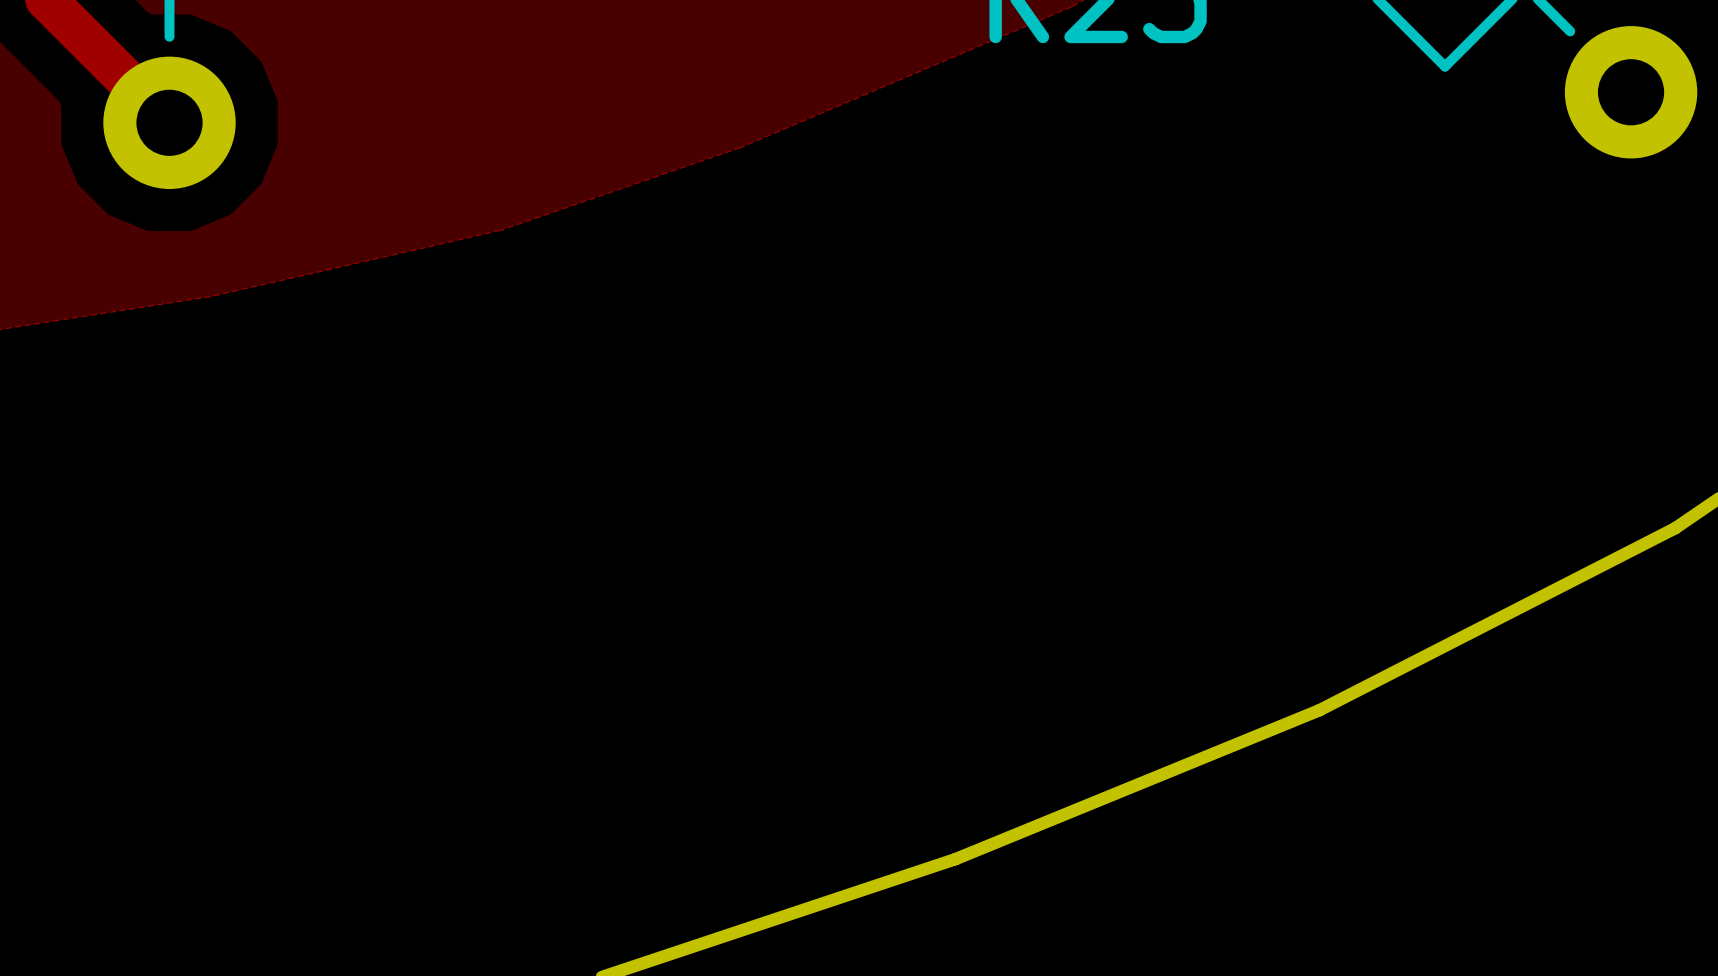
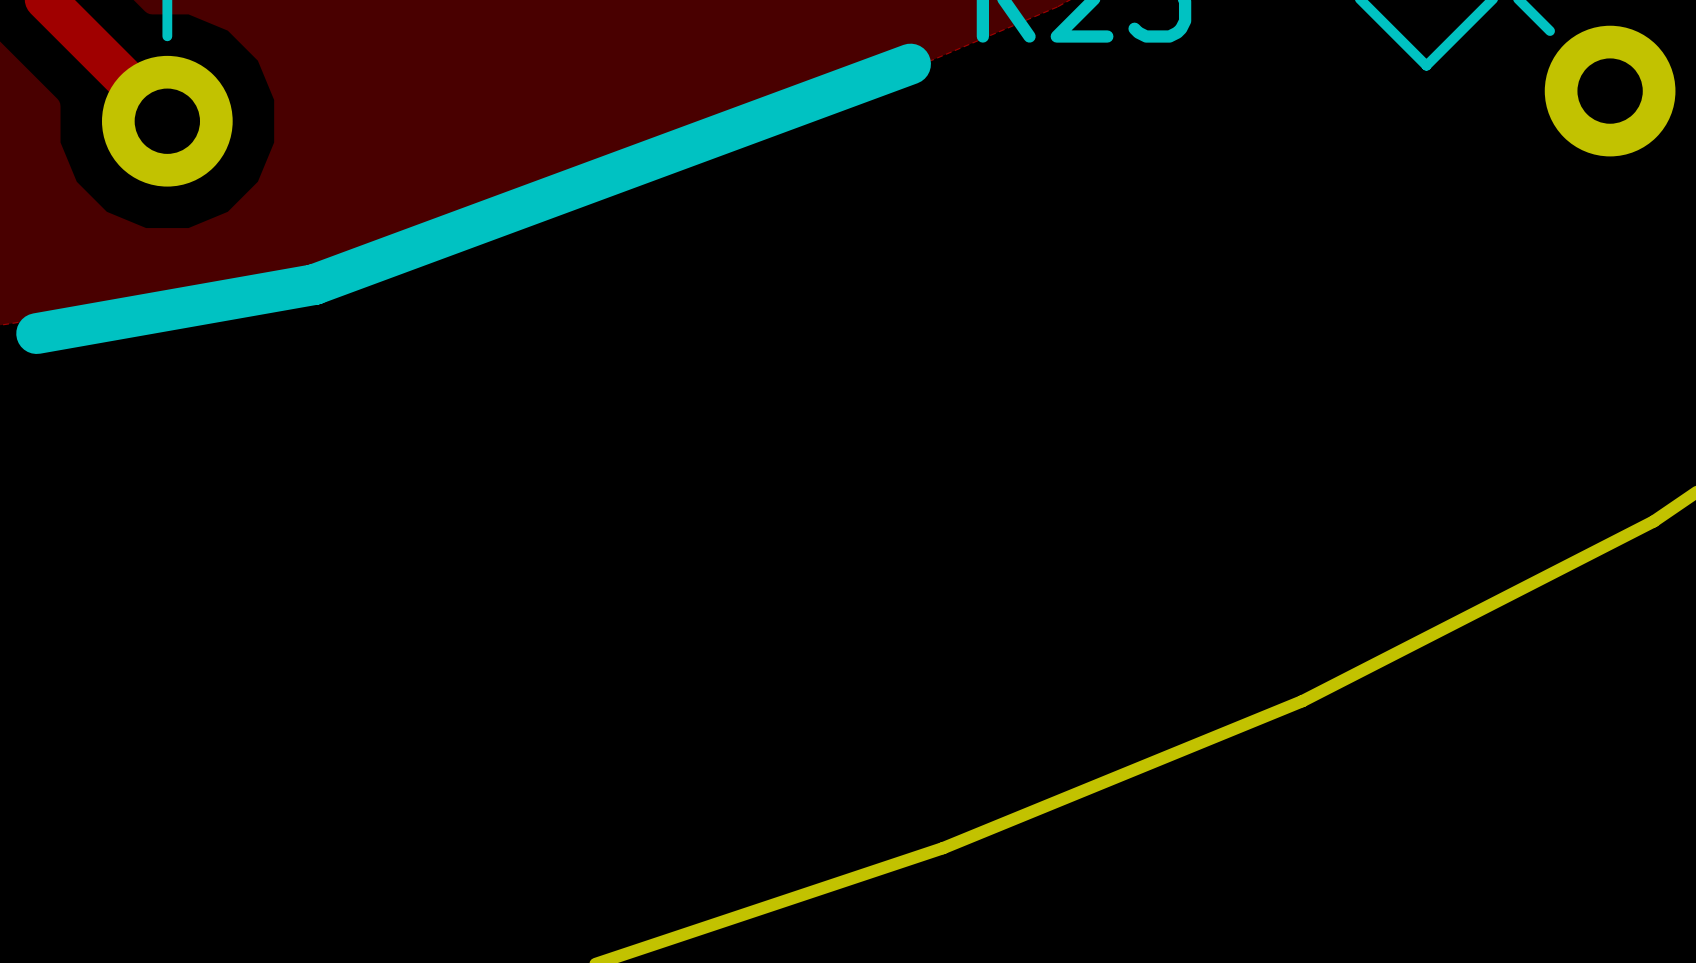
line: none -> (910, 64) (314, 284) (36, 333)

